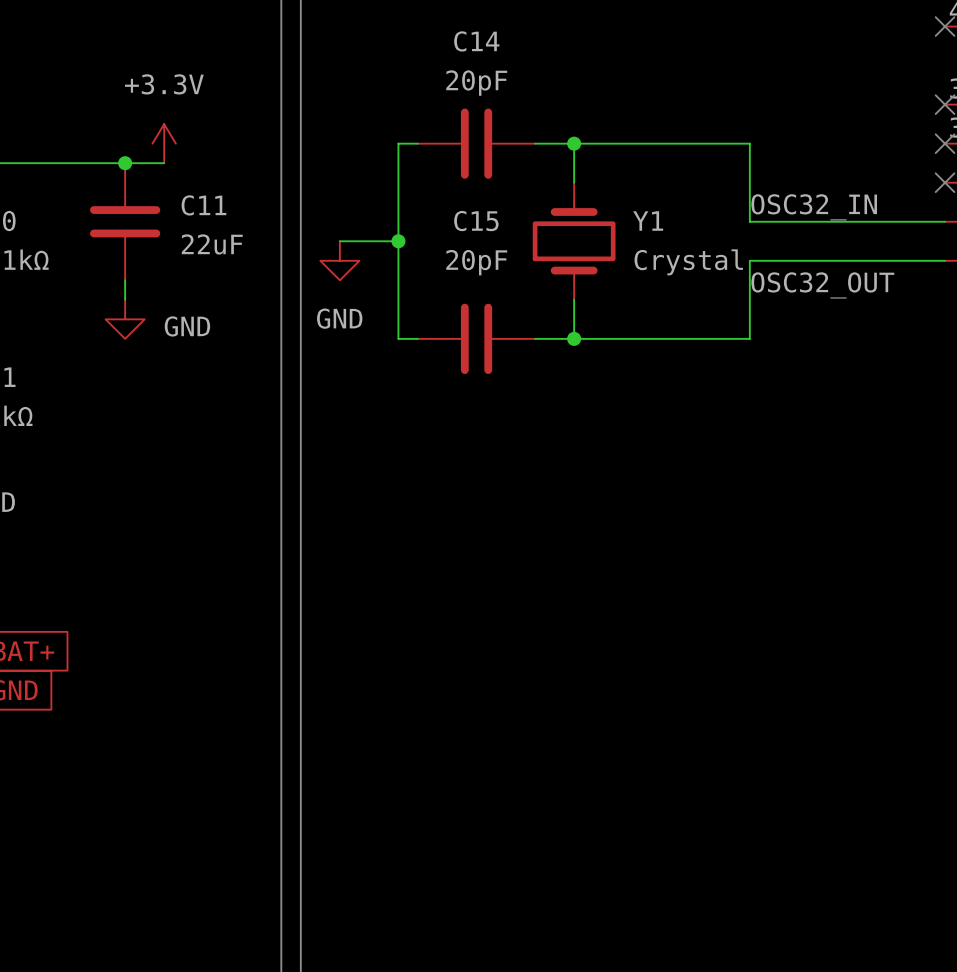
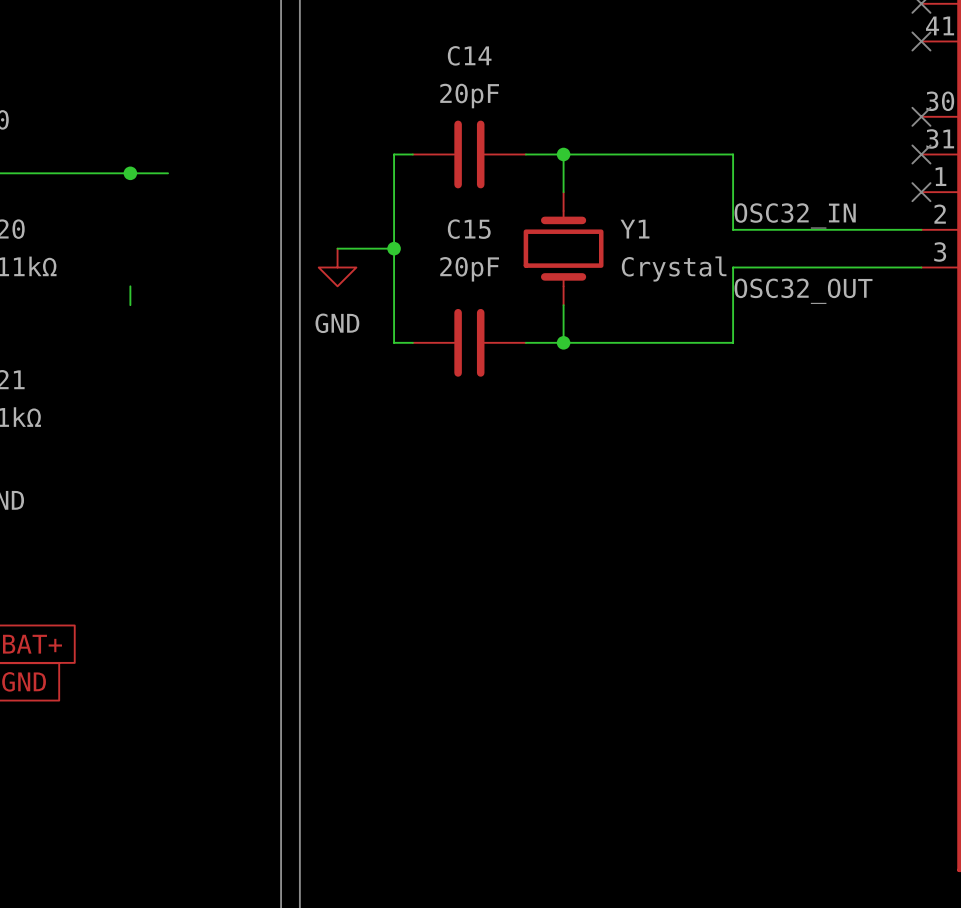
power symbol: +3.3V (164, 143) -> none
C11: 22uF (125, 221) -> none
power symbol: GND (125, 319) -> none

